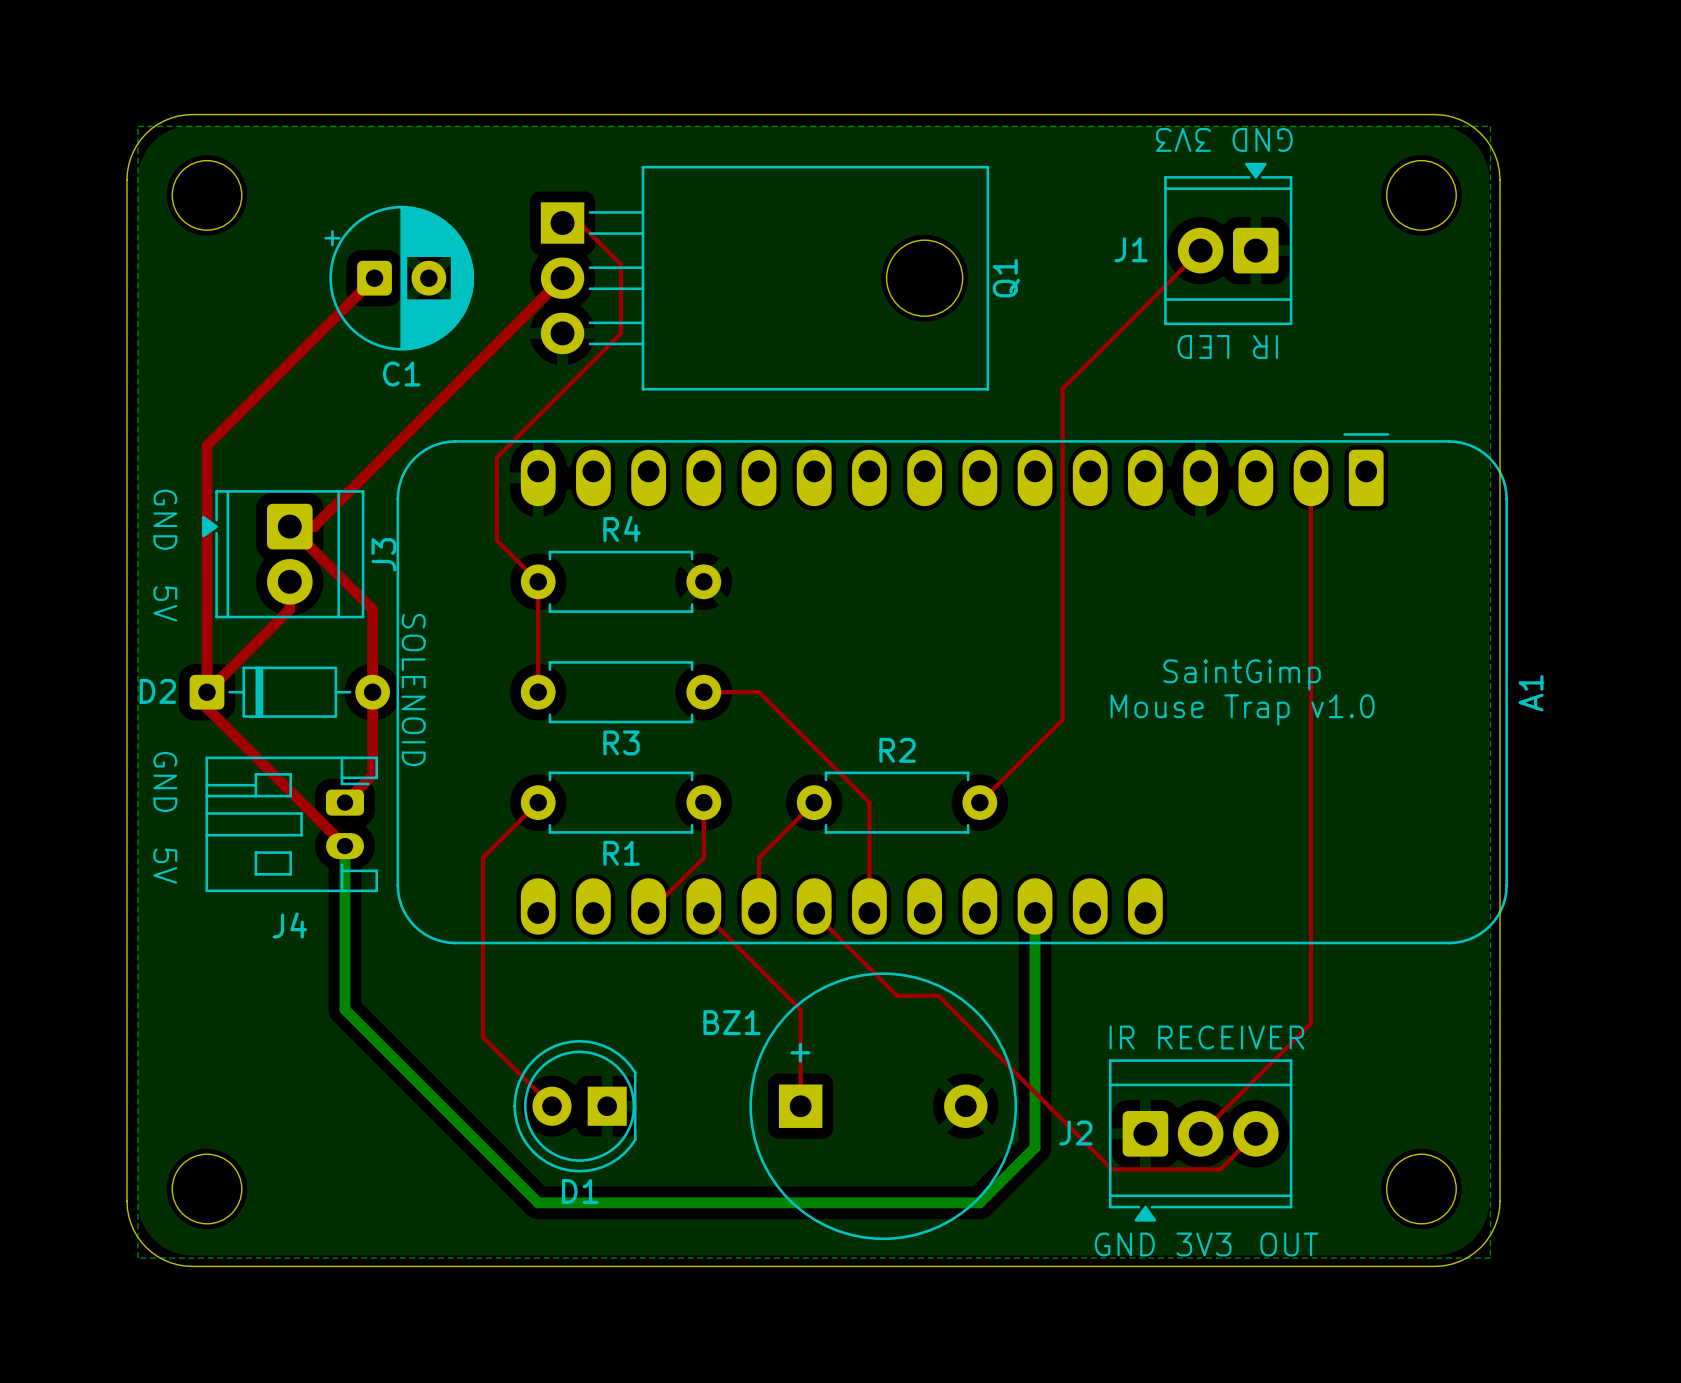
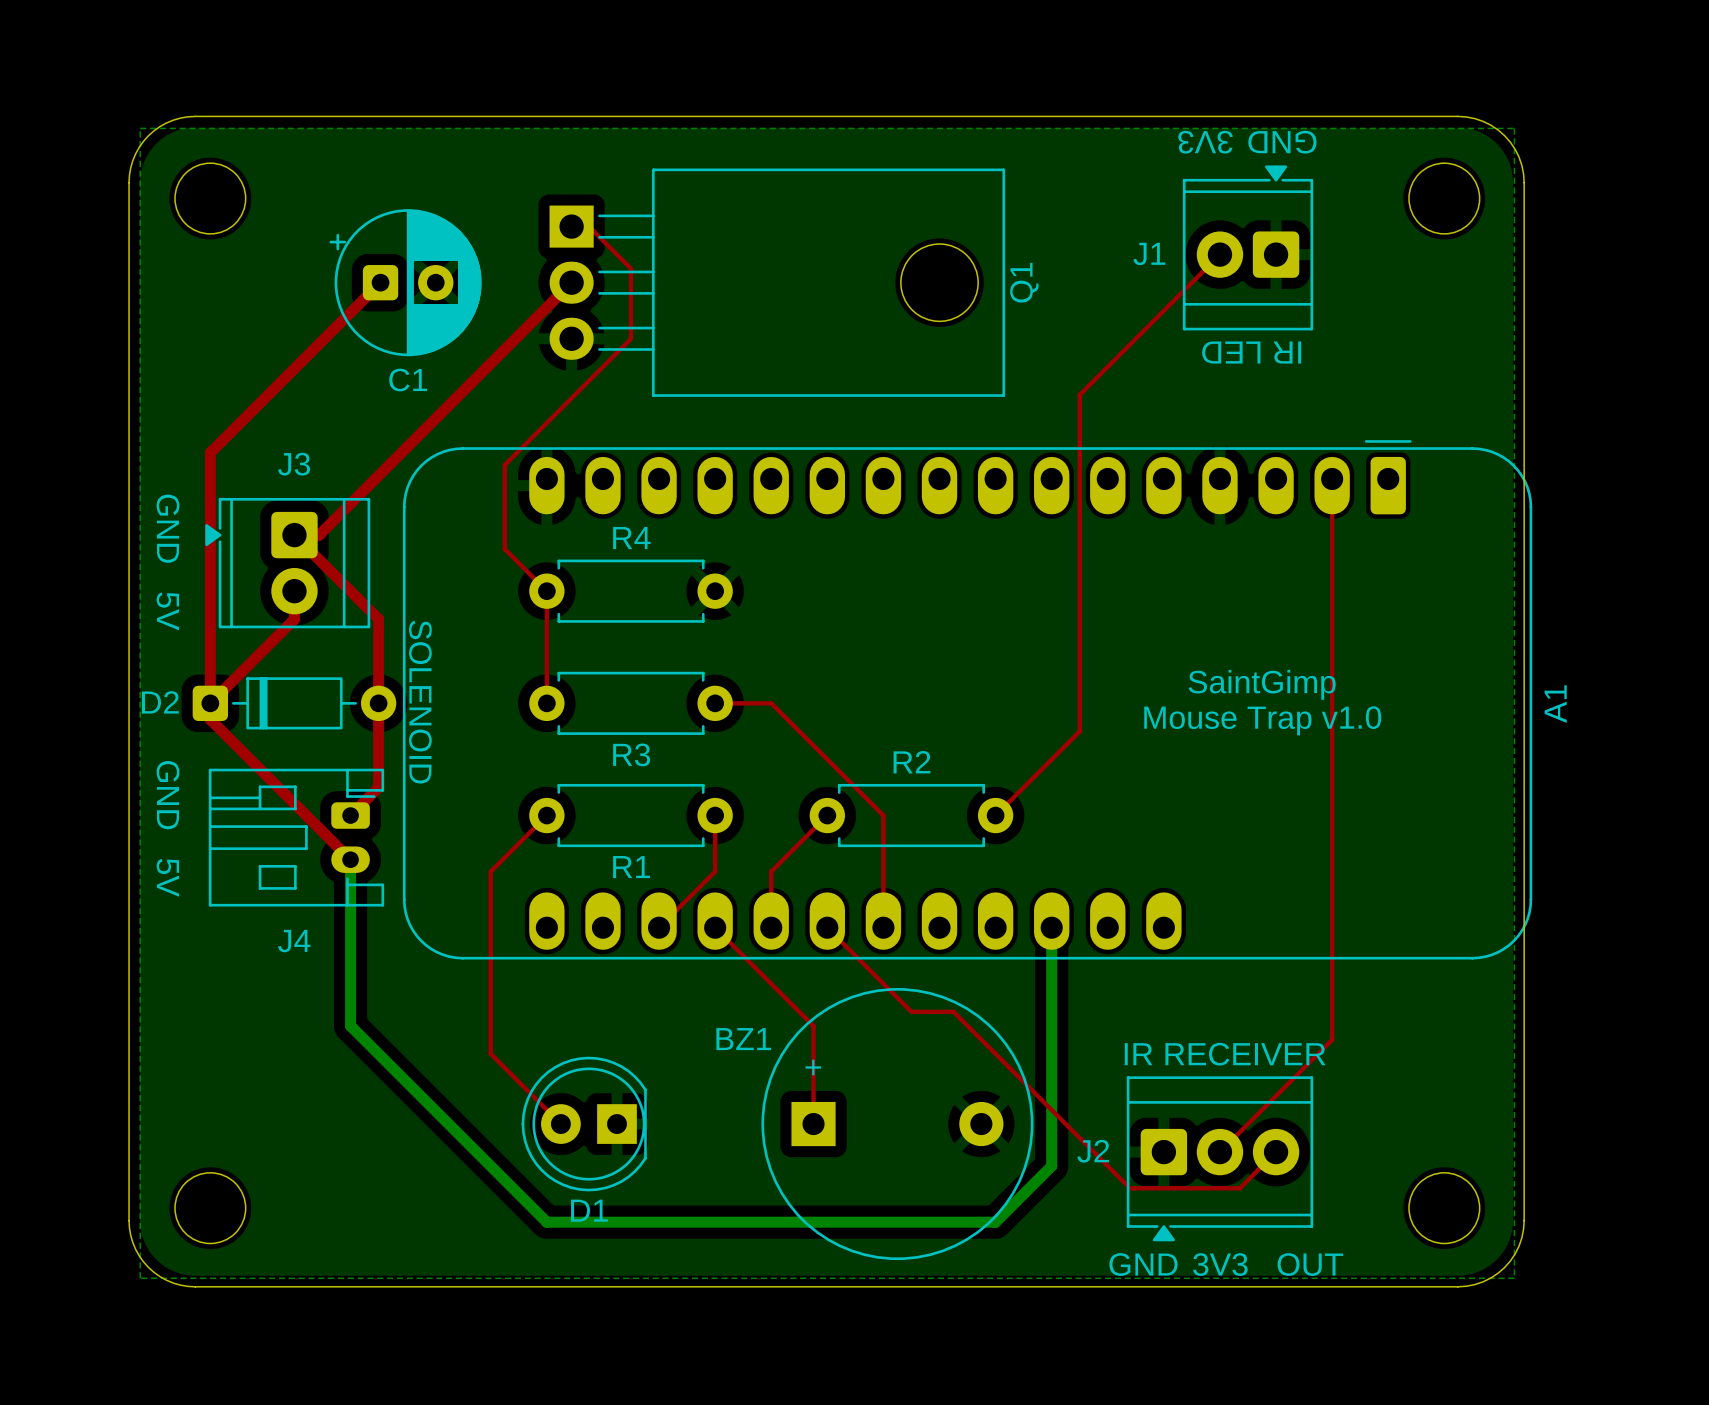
J3 name rotation: 0° (383, 554) -> 90° clockwise (294, 464)
J3 name position: J3 (383, 554) -> J3 (294, 464)

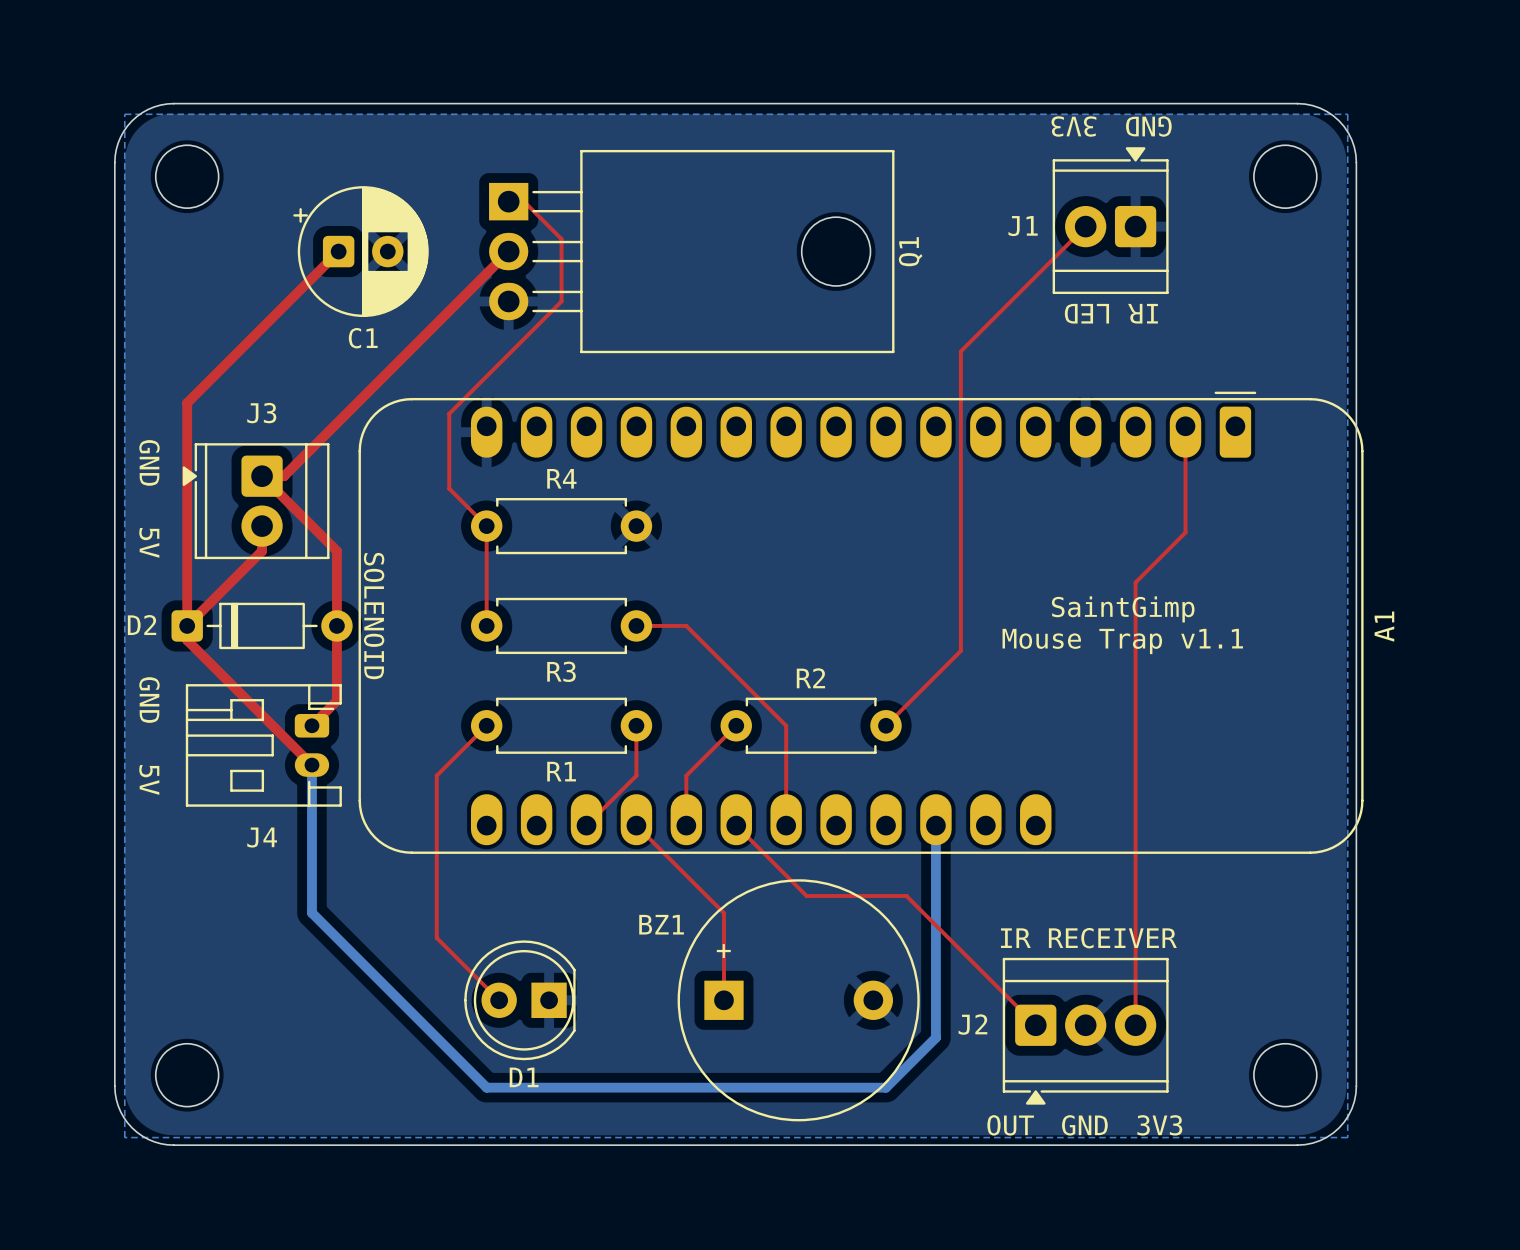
top track: (1332, 598) (1332, 1039) (1219, 1152) -> (1185, 532) (1135, 582) (1135, 1025)
text: Mouse Trap v1.0 (1262, 720) -> Mouse Trap v1.1 (1122, 641)
top track: (906, 1006) (911, 1011) (953, 1011) (1129, 1188) (1239, 1188) (1276, 1152) -> (806, 895) (906, 895) (1035, 1025)
text: GND (1143, 1264) -> OUT (1010, 1125)
text: 3V3 (1220, 1264) -> GND (1084, 1125)
text: OUT (1310, 1264) -> 3V3 (1159, 1125)

